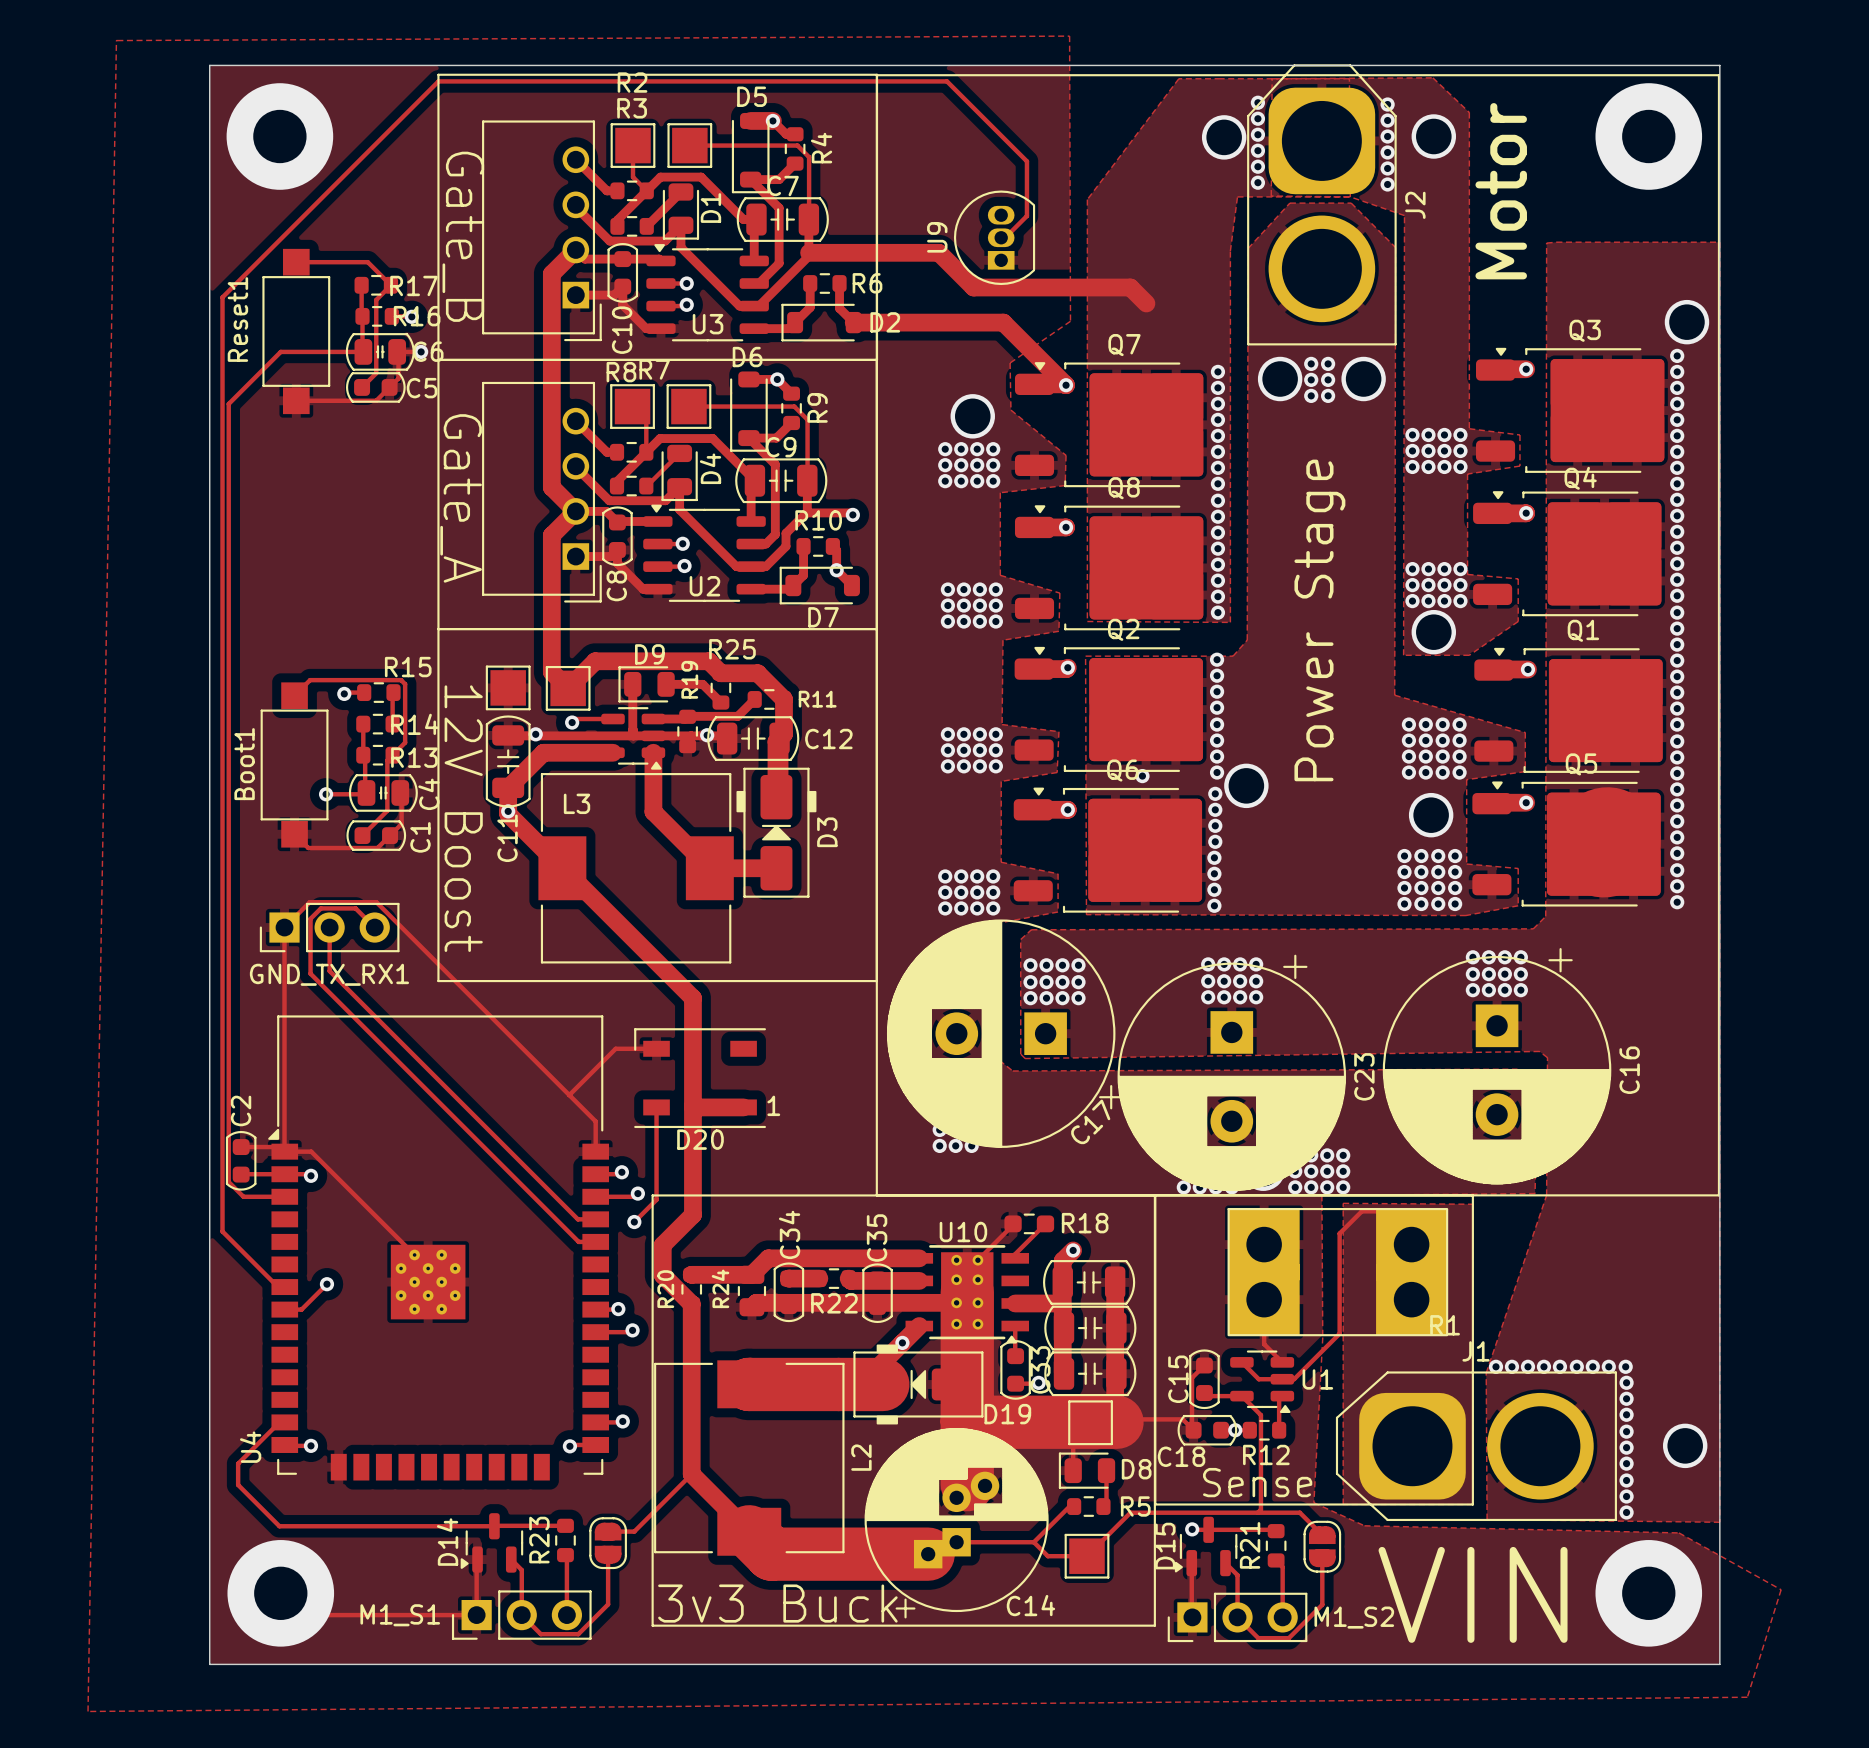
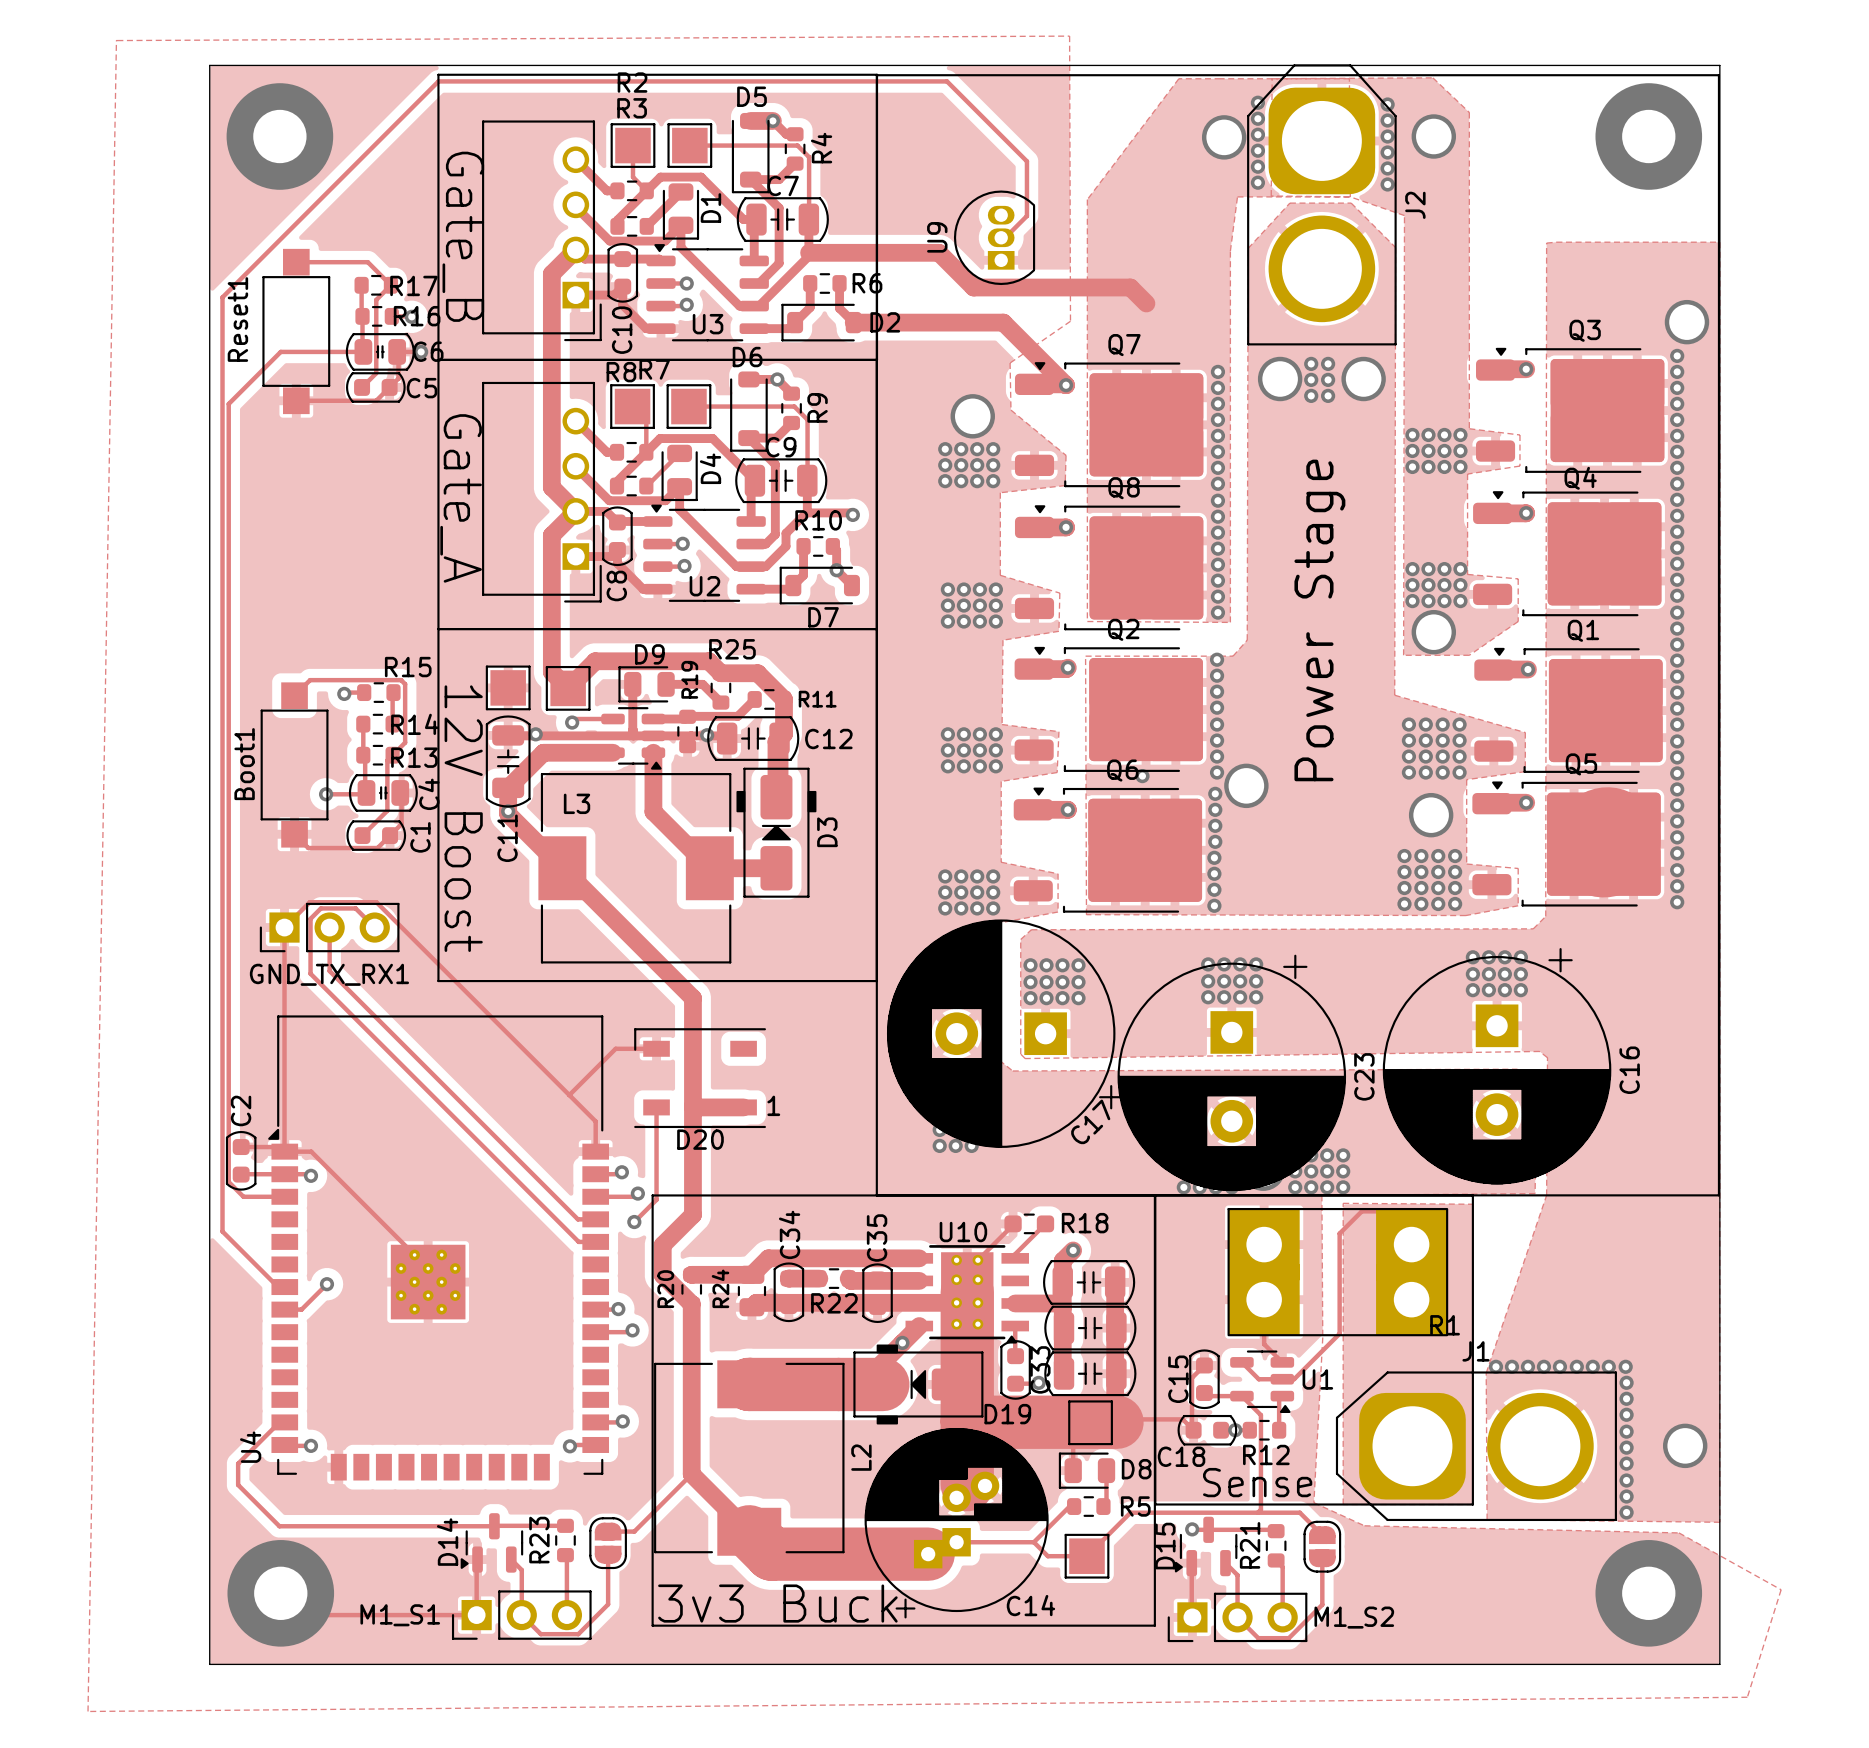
text: Motor (1501, 191) -> none
text: VIN (1473, 1594) -> none

